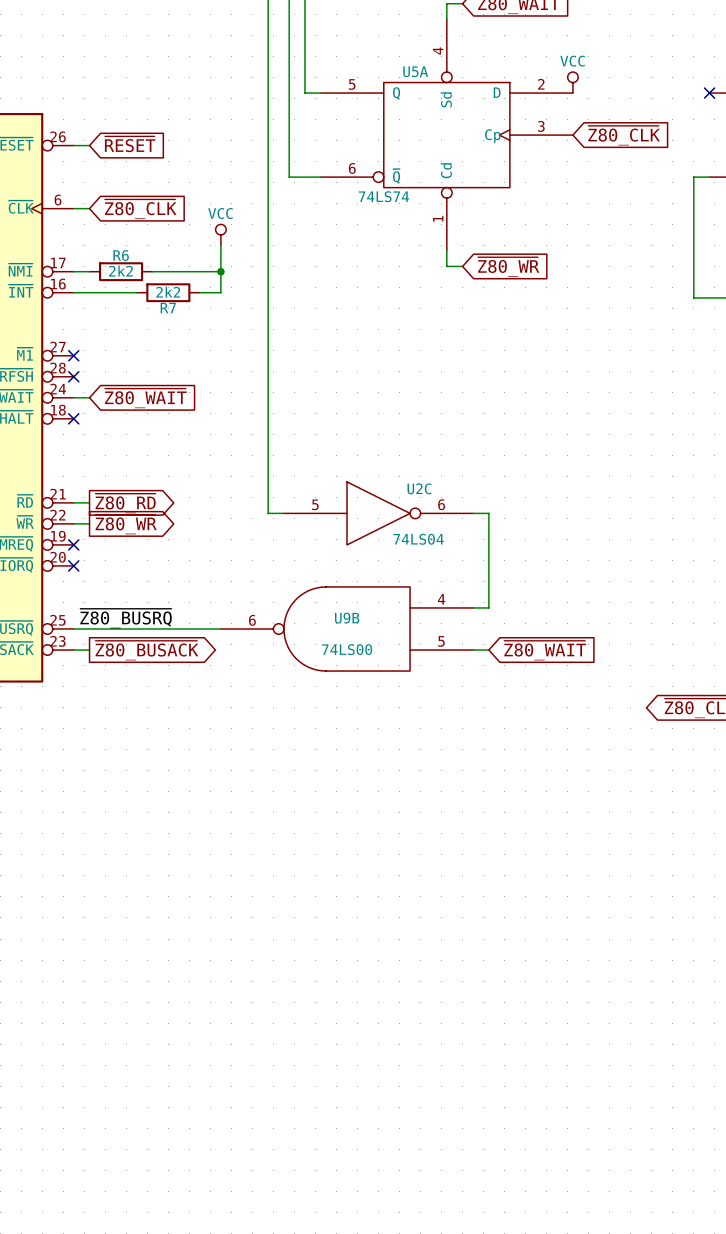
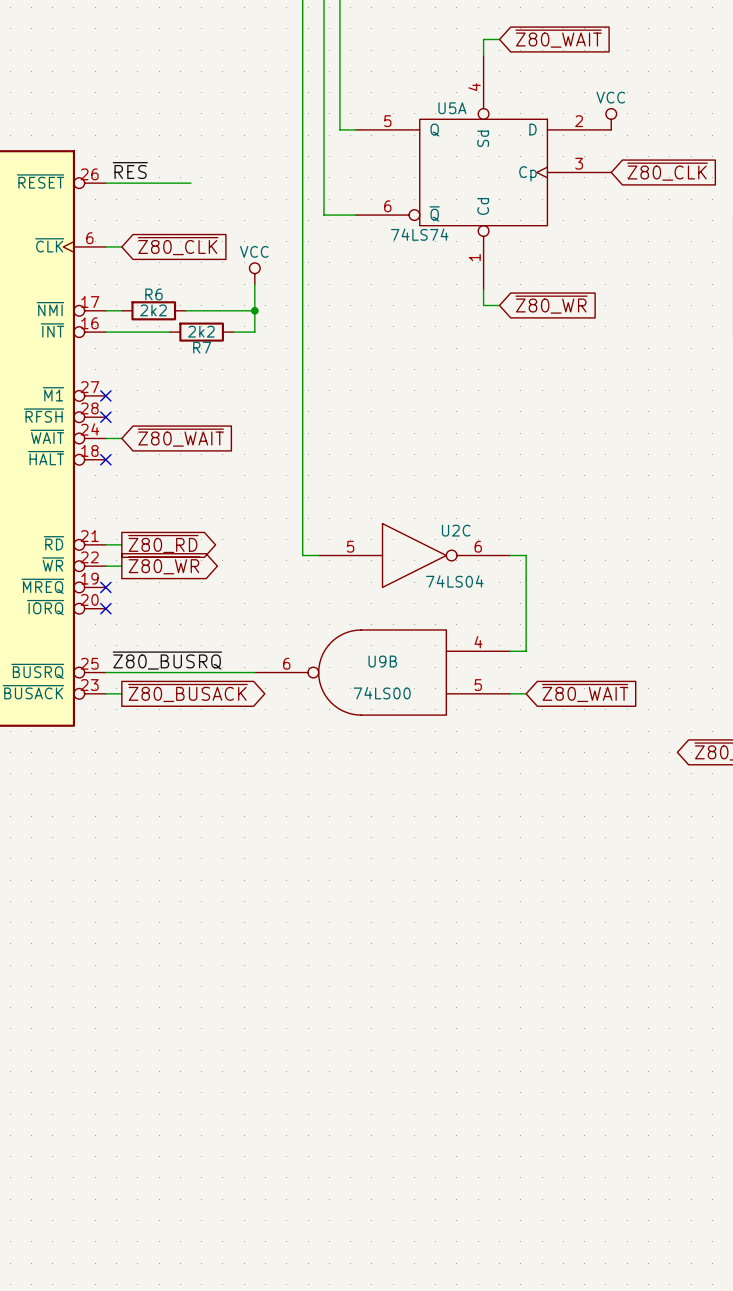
label: none -> ~{RES} (130, 170)
global label: ~{RESET} (130, 144) -> none
wire: none -> (121, 183) (190, 183)

